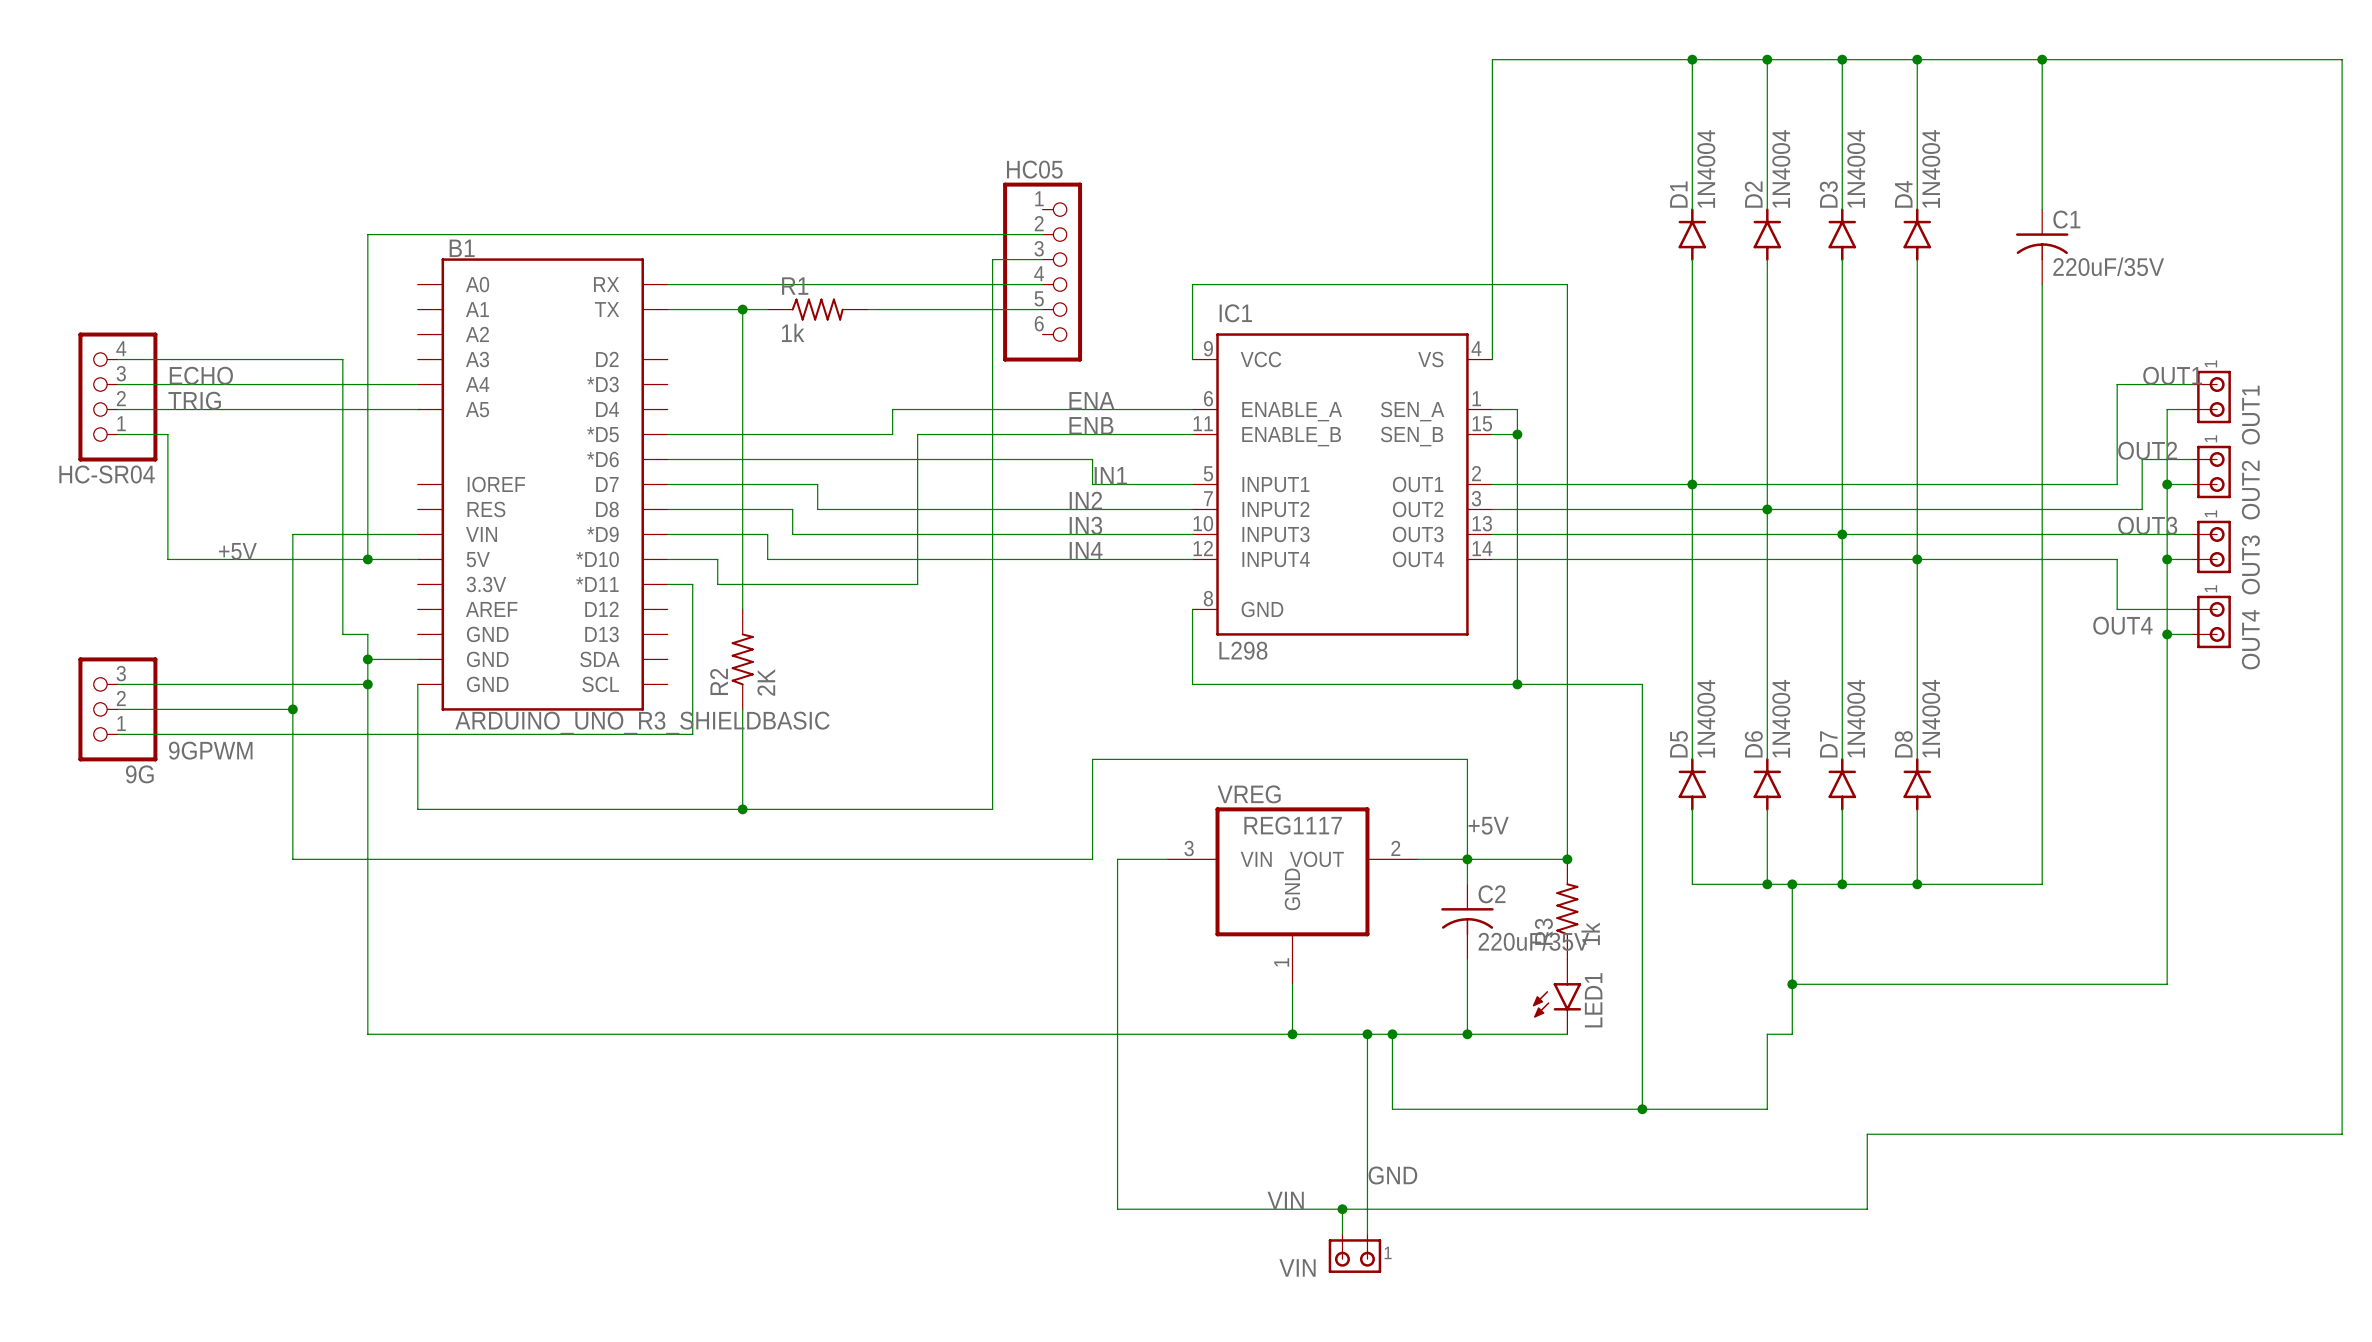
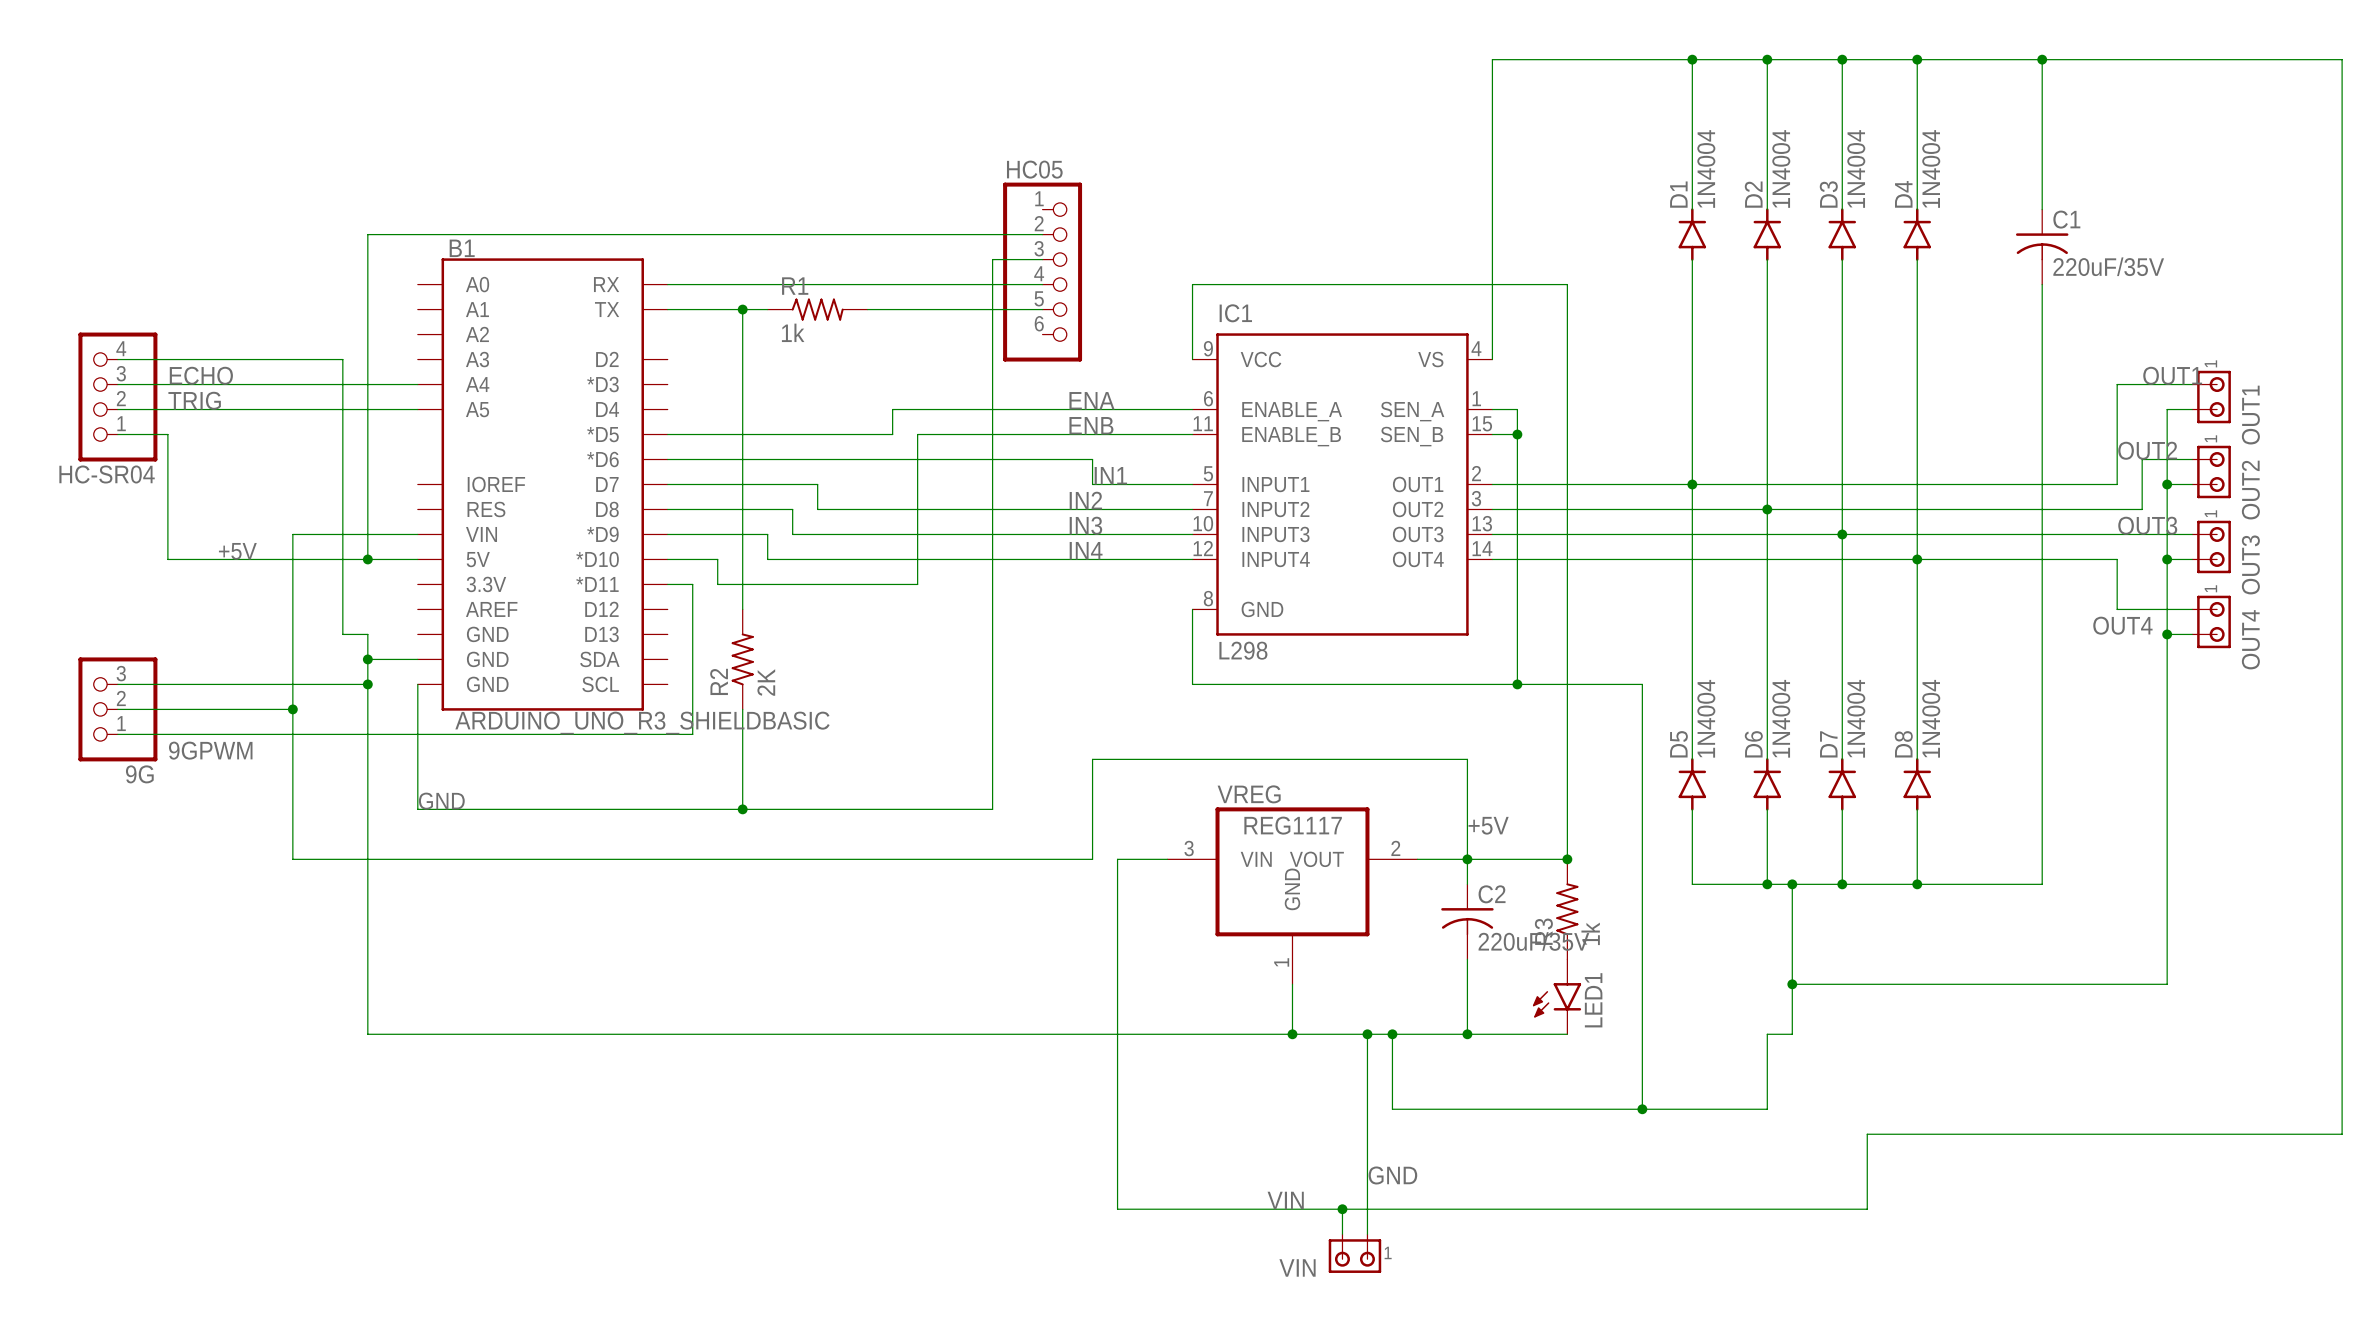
label: none -> GND (441, 801)

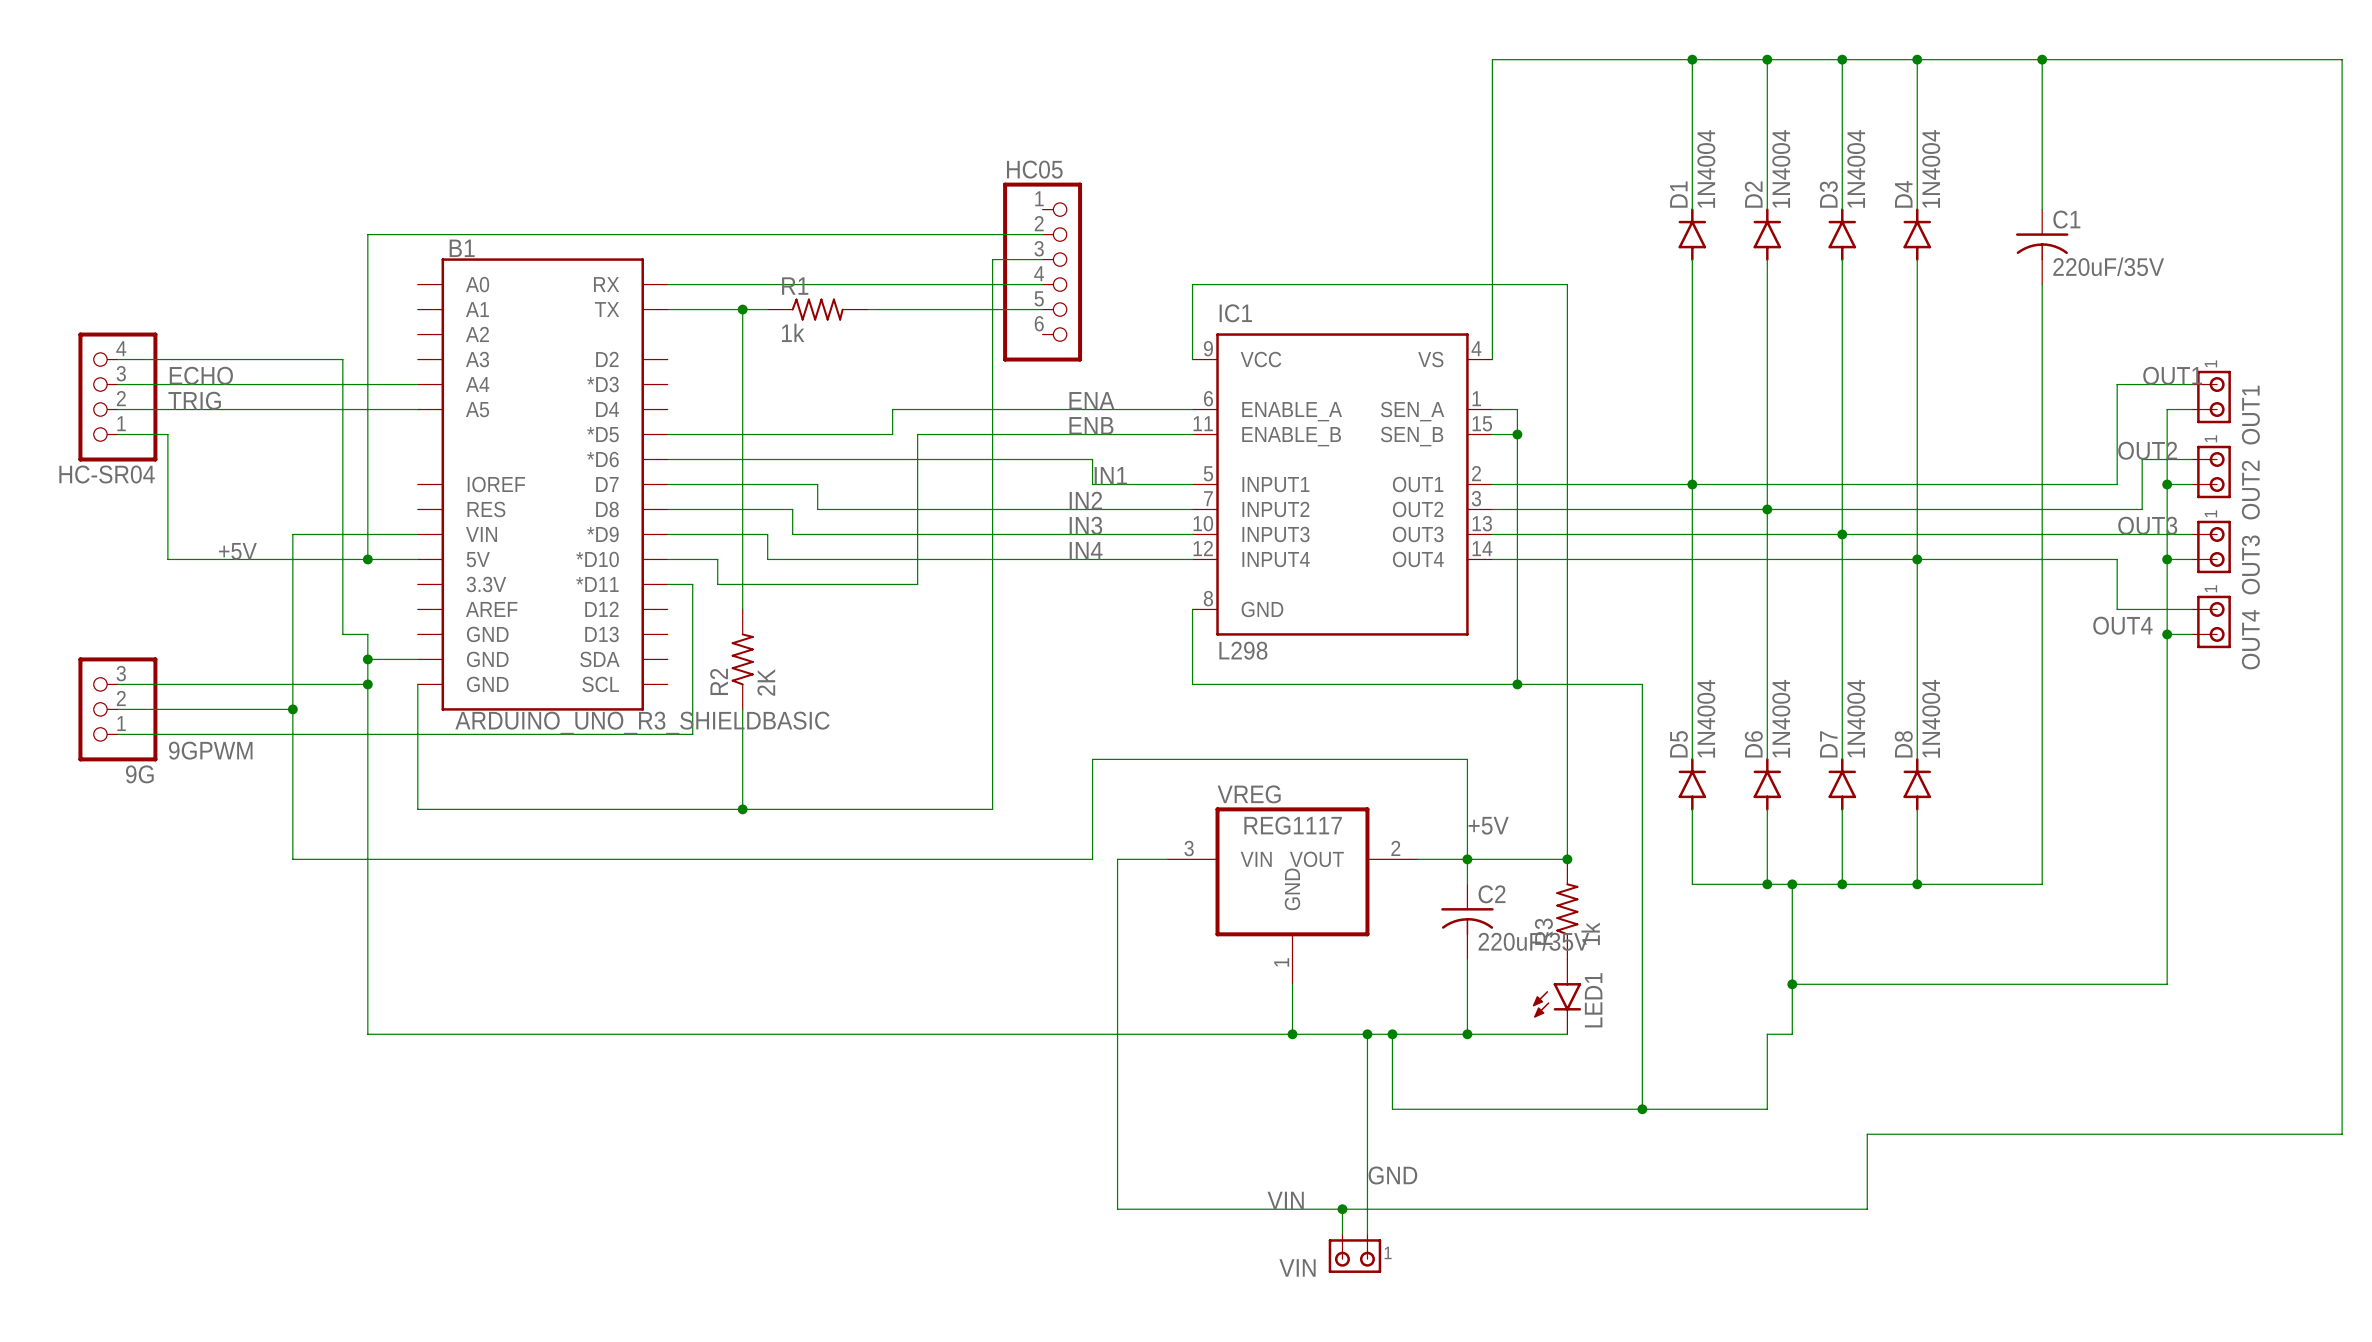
label: GND (441, 801) -> none

